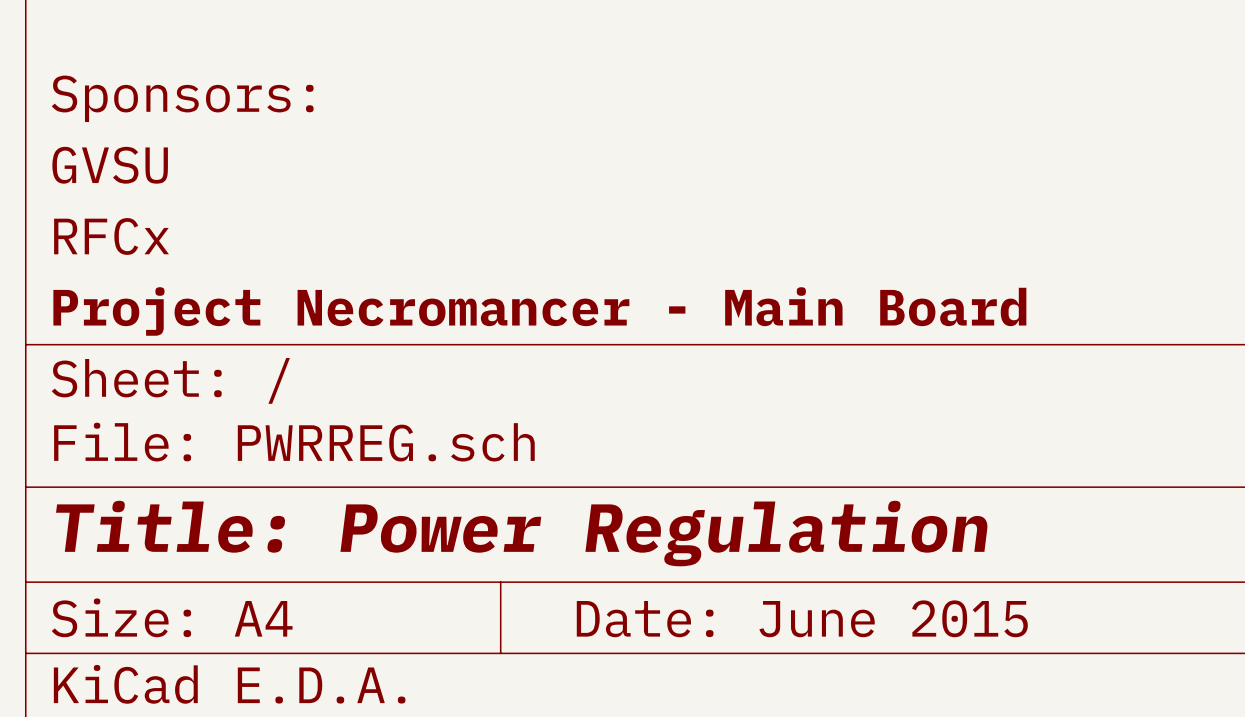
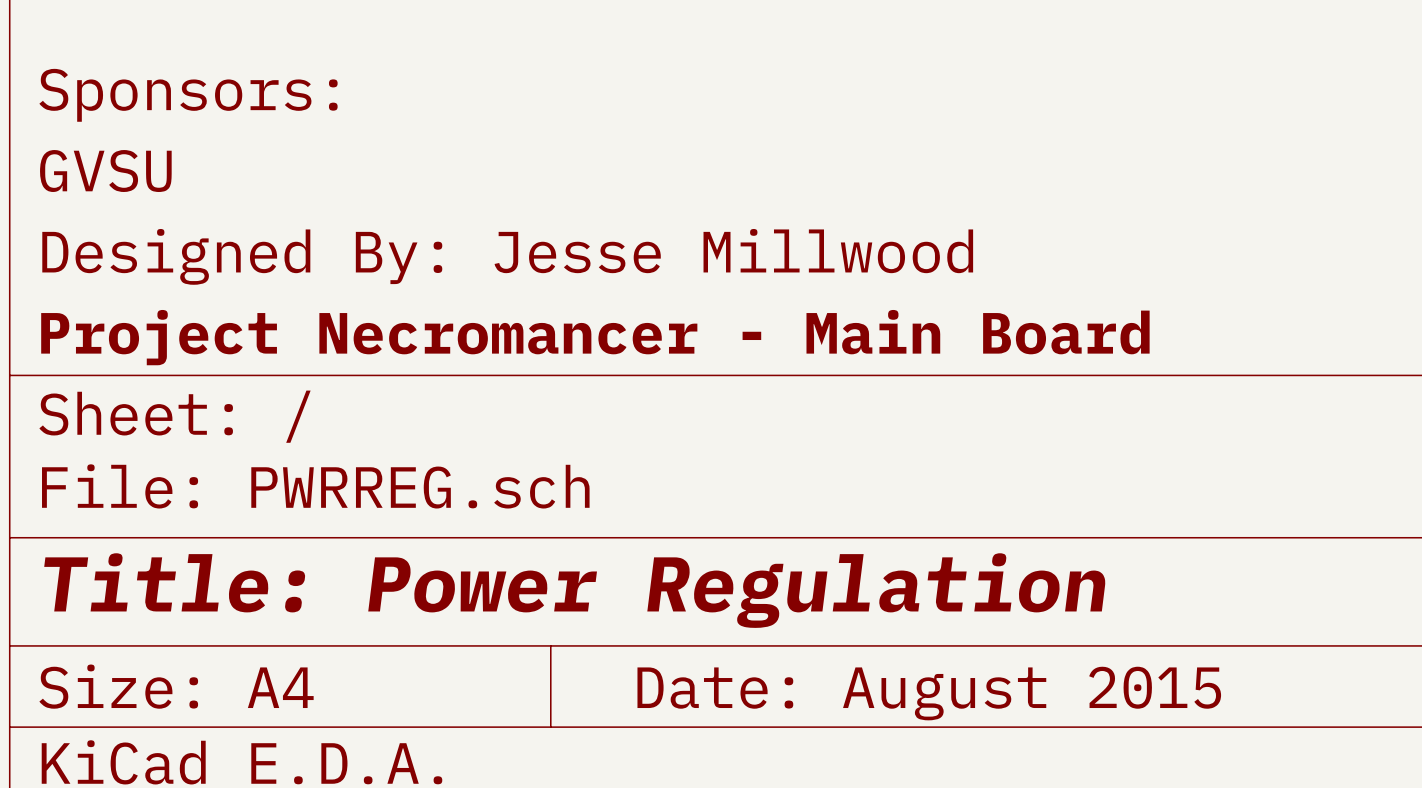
title block: RFCx (111, 236) -> Designed By: Jesse Millwood (507, 256)
title block: Date: June 2015 (802, 618) -> Date: August 2015 (929, 693)

